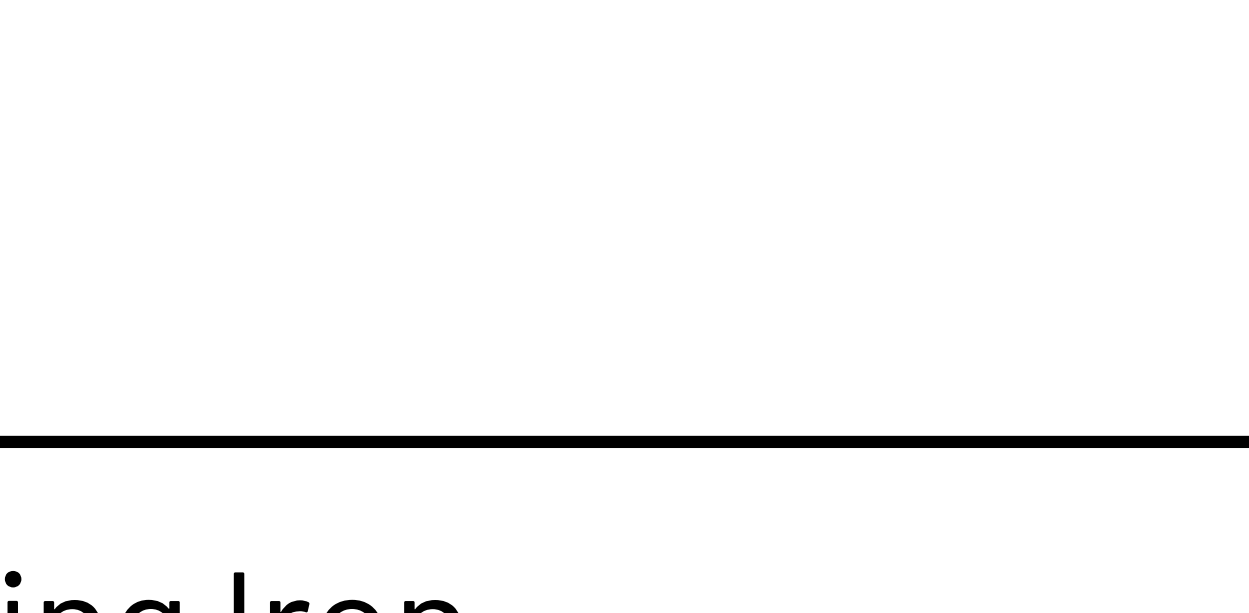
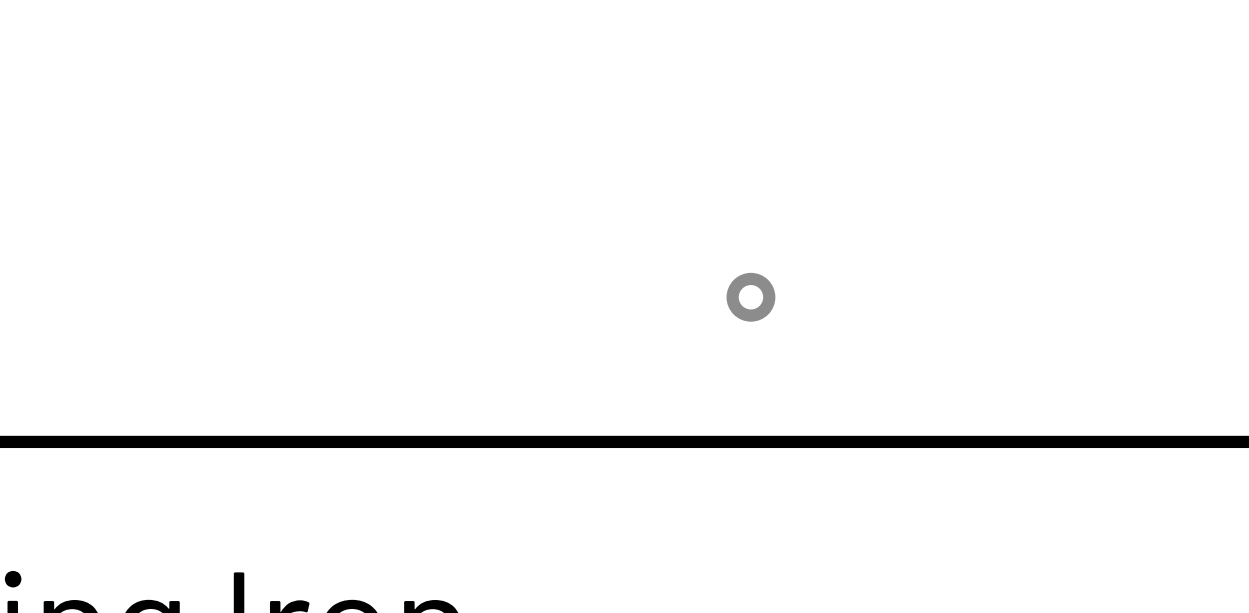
part: none -> (750, 297)

